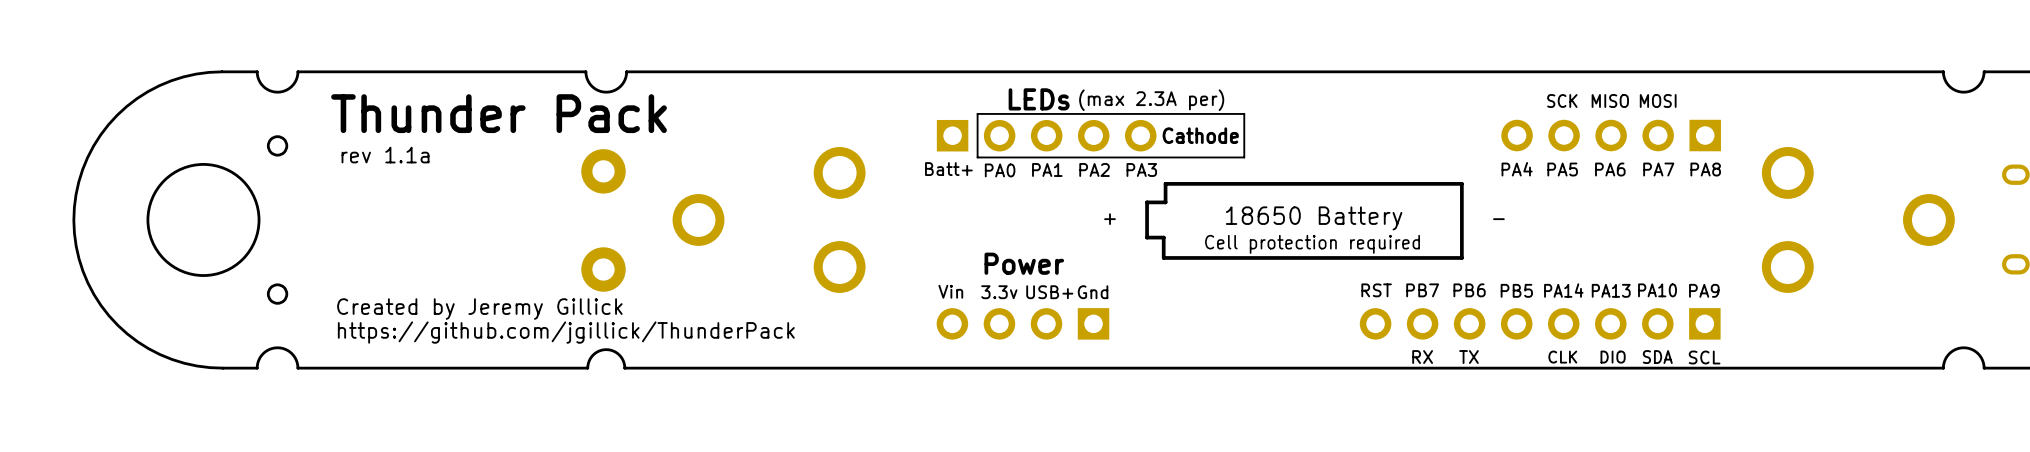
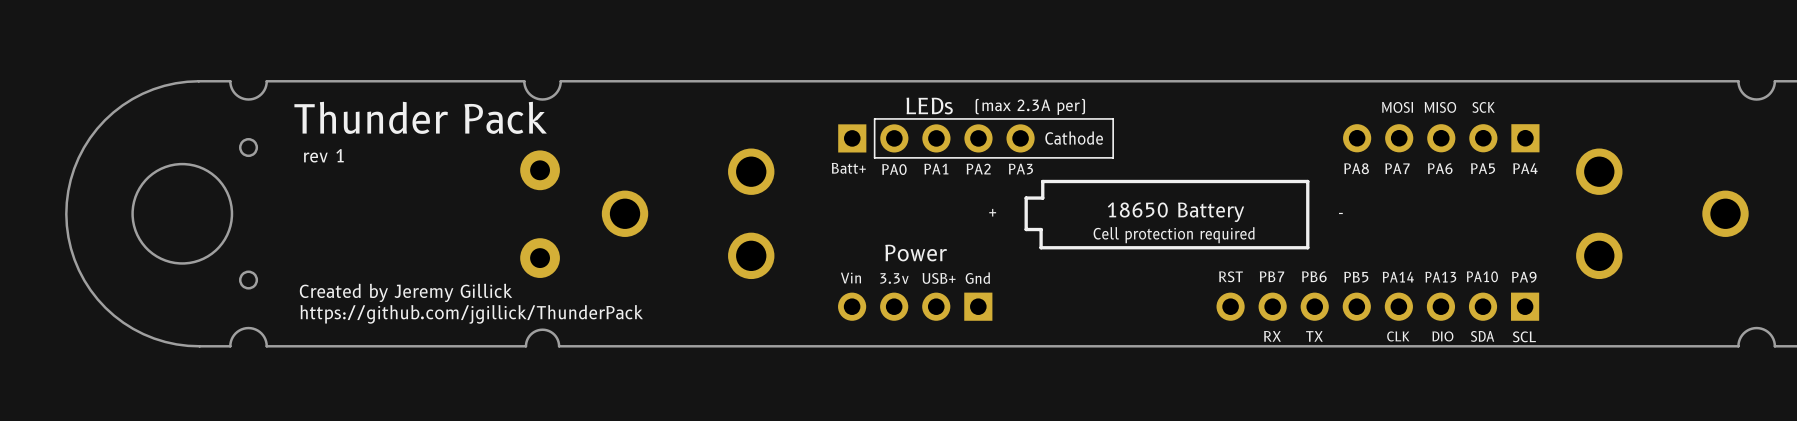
text: SCK (1562, 101) -> MOSI (1397, 107)
text: MOSI (1658, 101) -> SCK (1483, 107)
text: rev 1.1a (385, 155) -> rev 1 (323, 155)
text: PA4 (1517, 169) -> PA8 (1356, 168)
text: PA5 (1562, 169) -> PA7 (1397, 168)
text: PA7 (1658, 169) -> PA5 (1483, 168)
text: PA8 (1705, 169) -> PA4 (1525, 168)

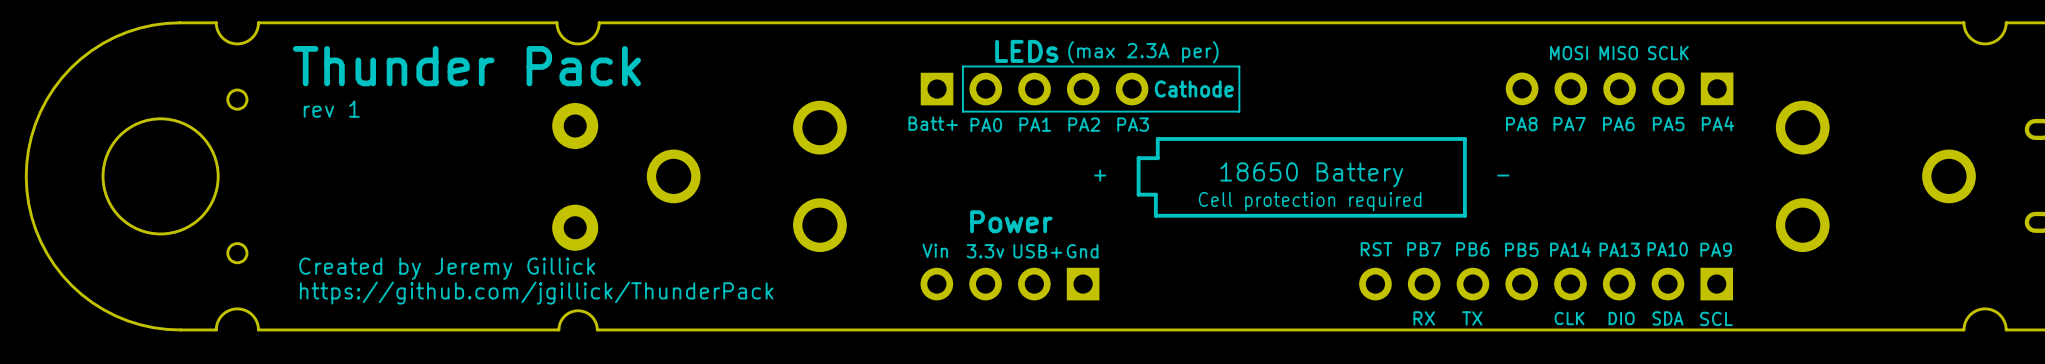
text: SCK (1483, 107) -> SCLK (1668, 53)

